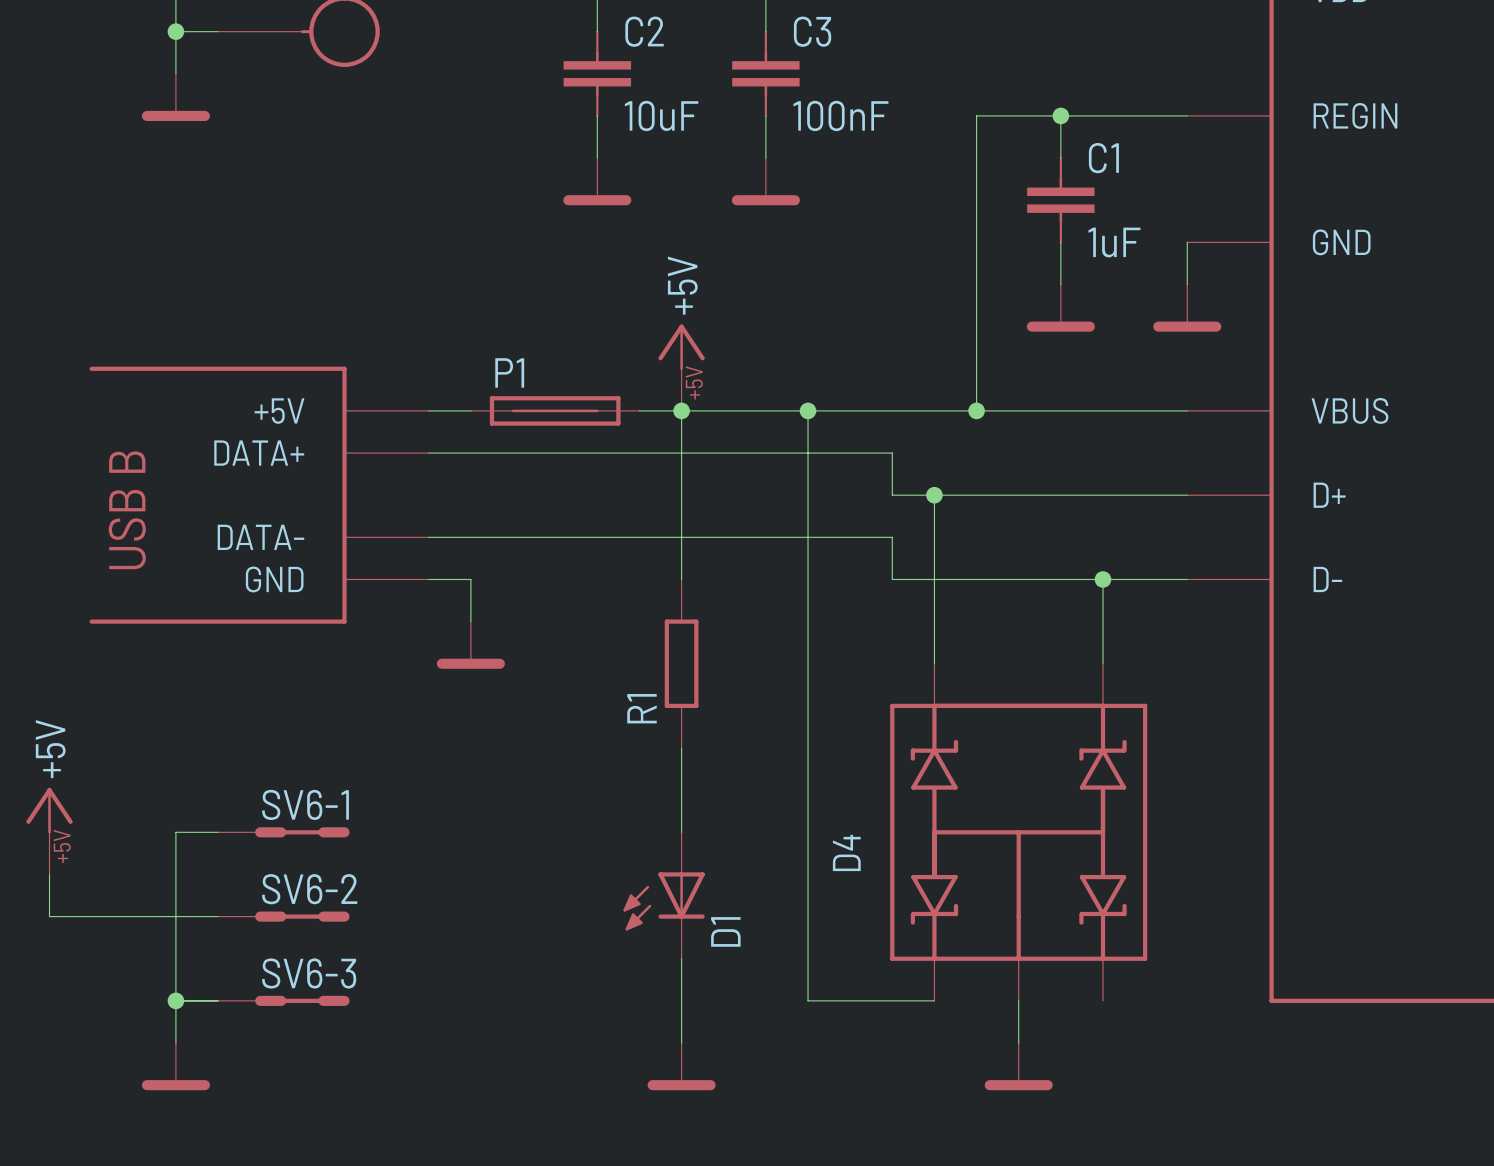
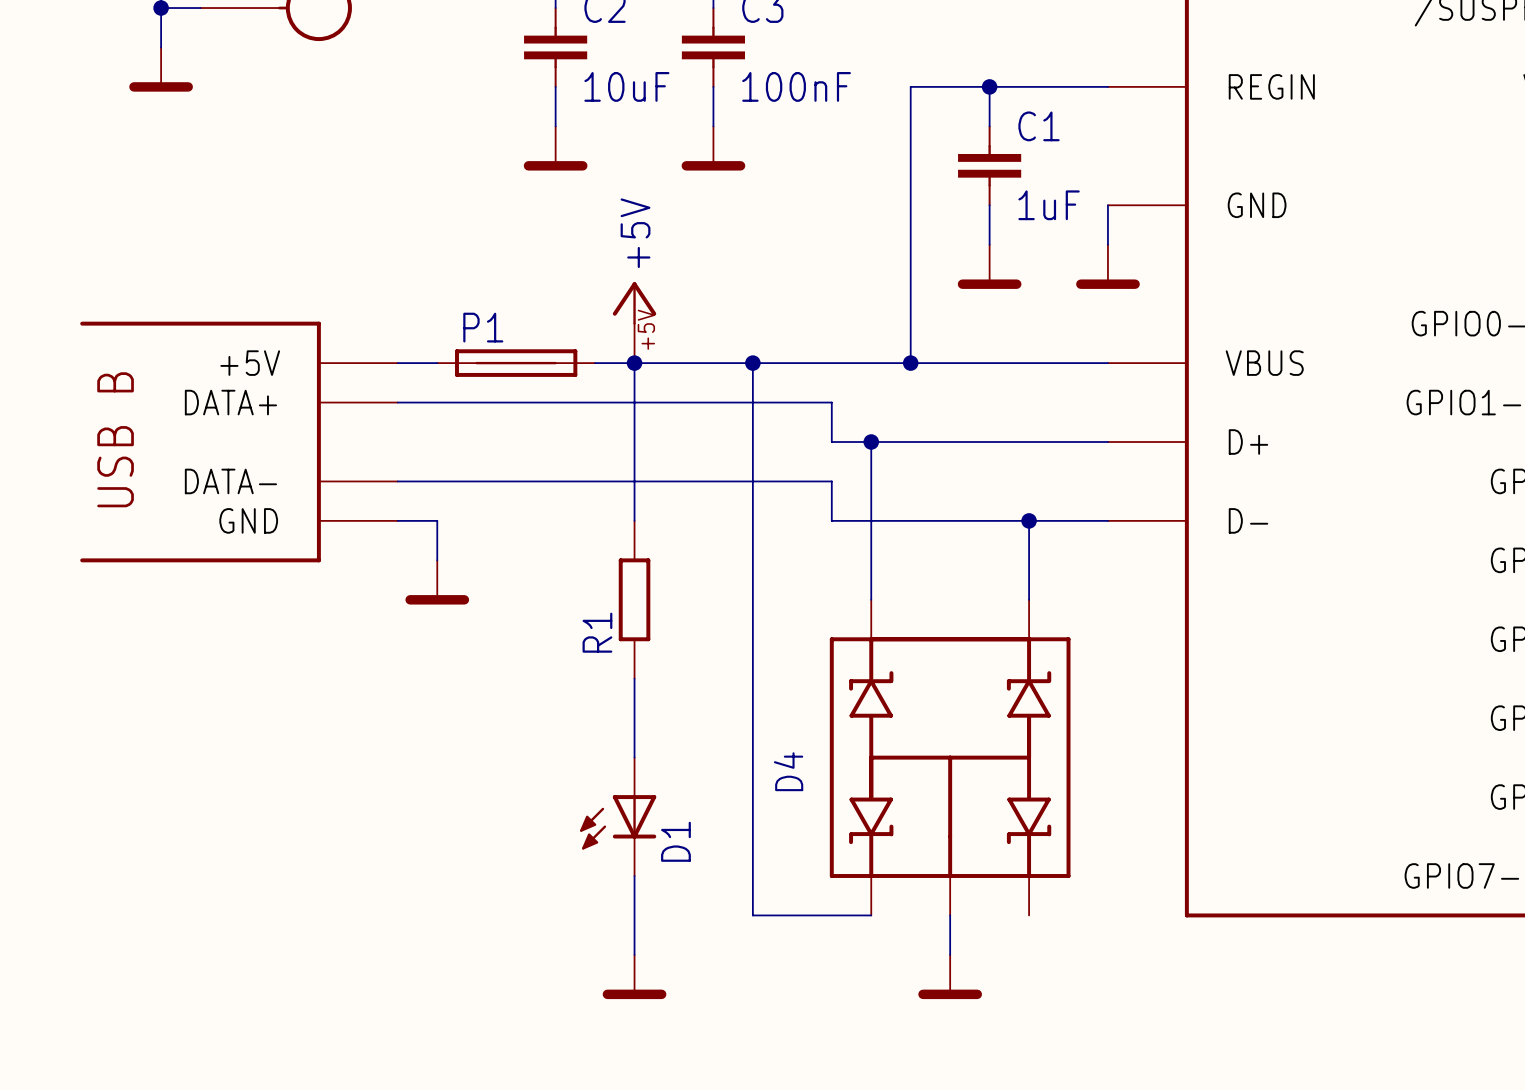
power symbol: +5V (49, 831) -> none
wire: (218, 832) (175, 832) (175, 1043) -> none
SV6-1: (283, 832) -> none
wire: (49, 874) (49, 916) (218, 916) -> none
SV6-2: (283, 916) -> none
wire: (175, 1000) (218, 1000) -> none
junction: (175, 1000) -> none
SV6-3: (283, 1000) -> none
power symbol: (175, 1066) -> none

